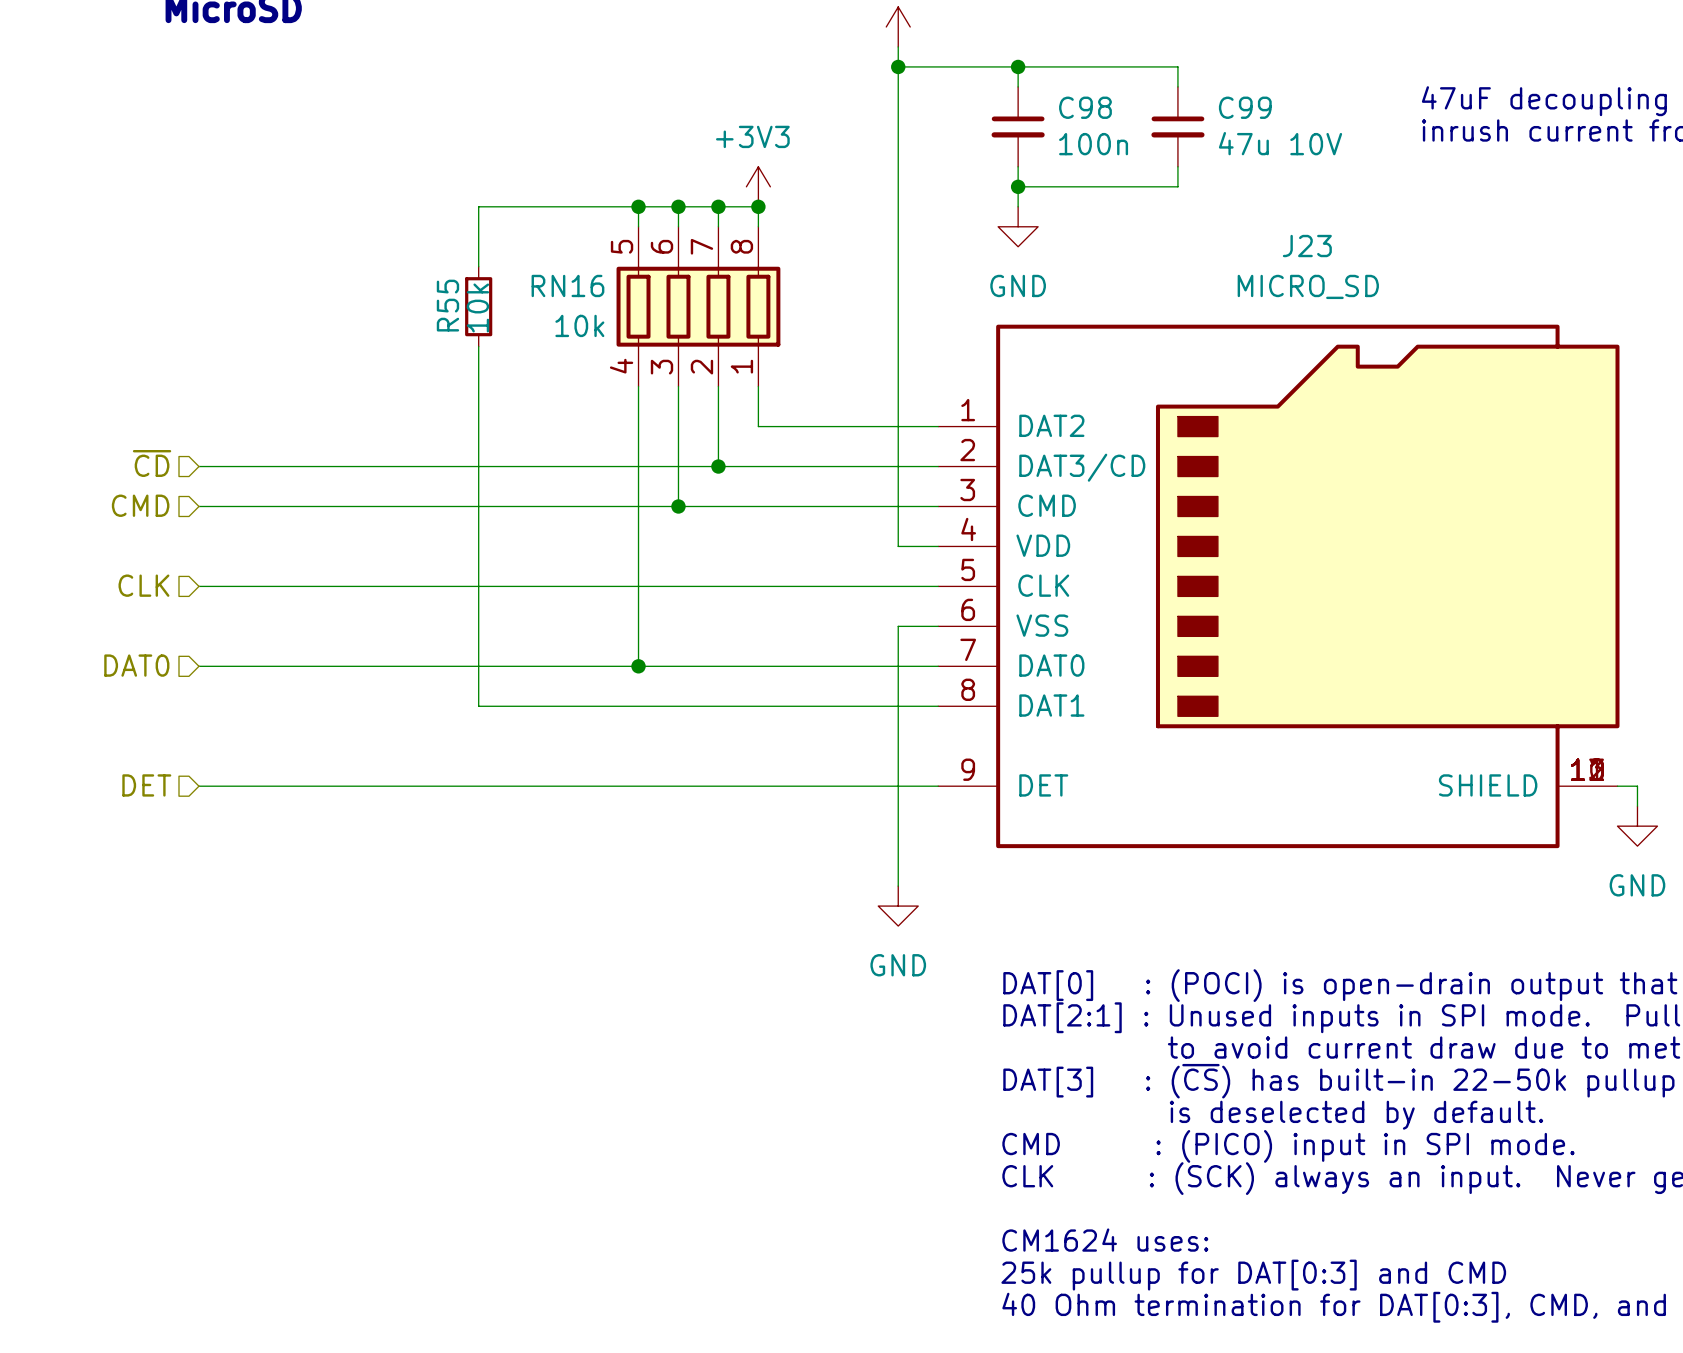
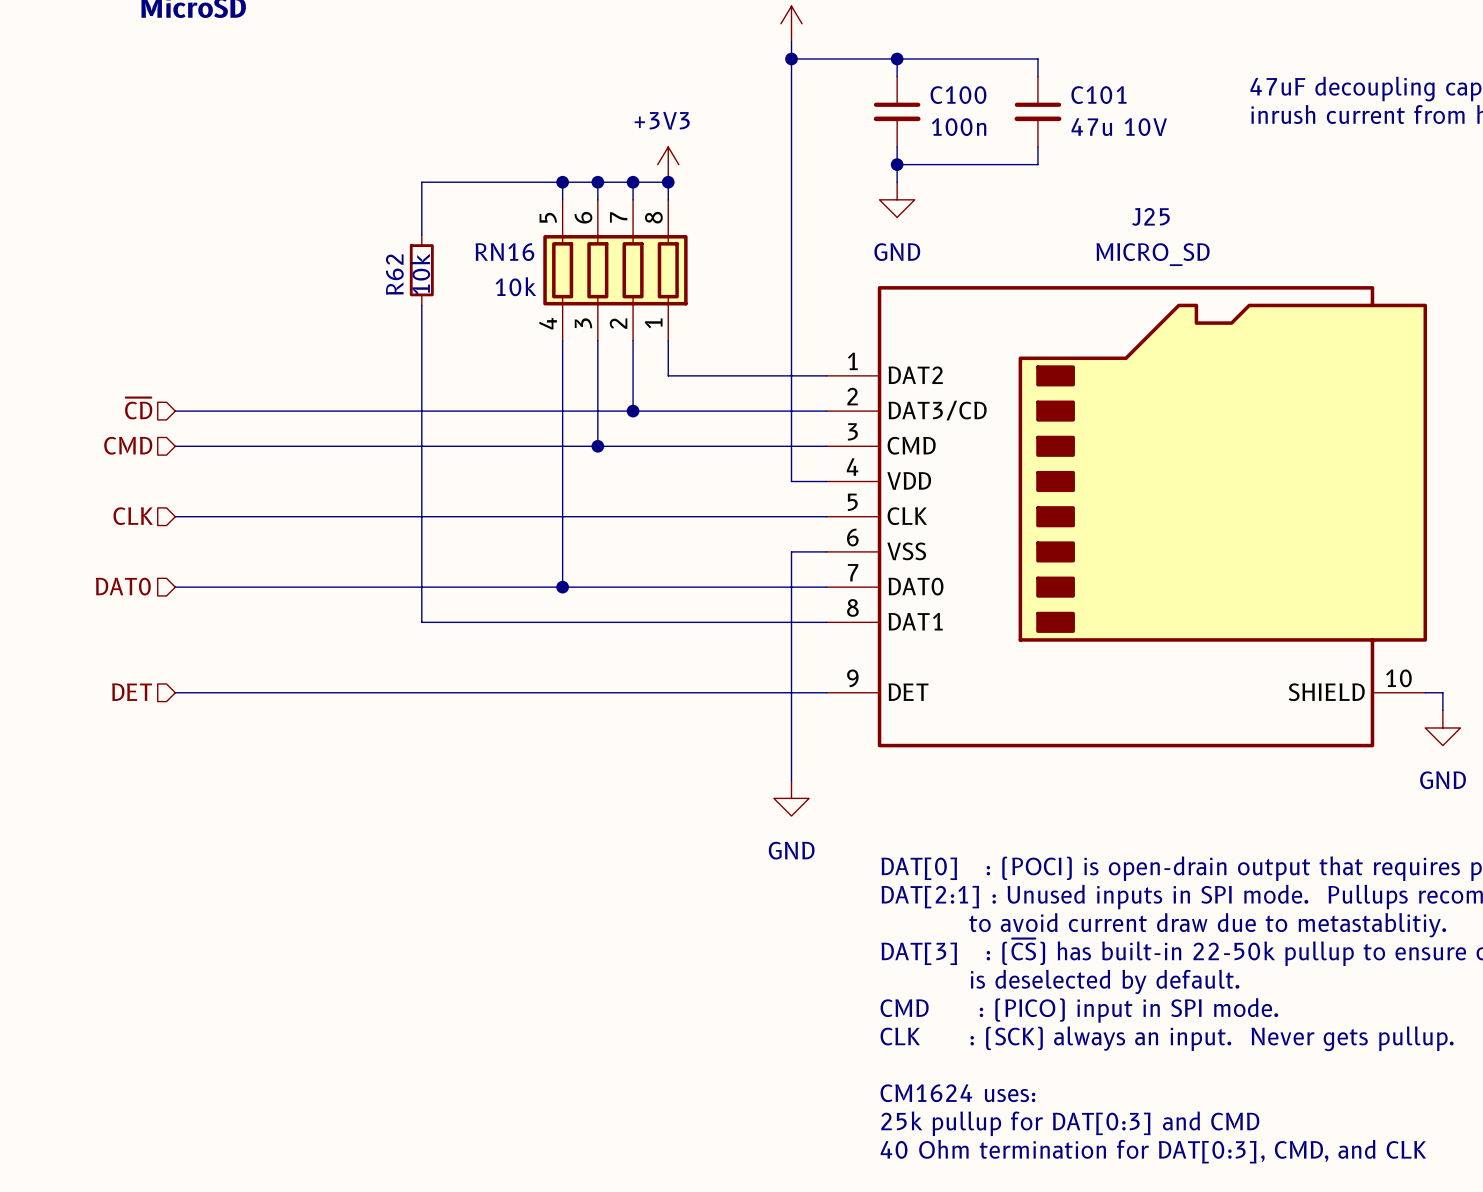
C98 name: C98 (1085, 107) -> C100 (958, 95)
C99 name: C99 (1245, 107) -> C101 (1098, 95)
R55 name: R55 (447, 305) -> R62 (394, 274)
J23: MICRO_SD (1278, 586) -> none
J25: none -> MICRO_SD (1126, 516)

